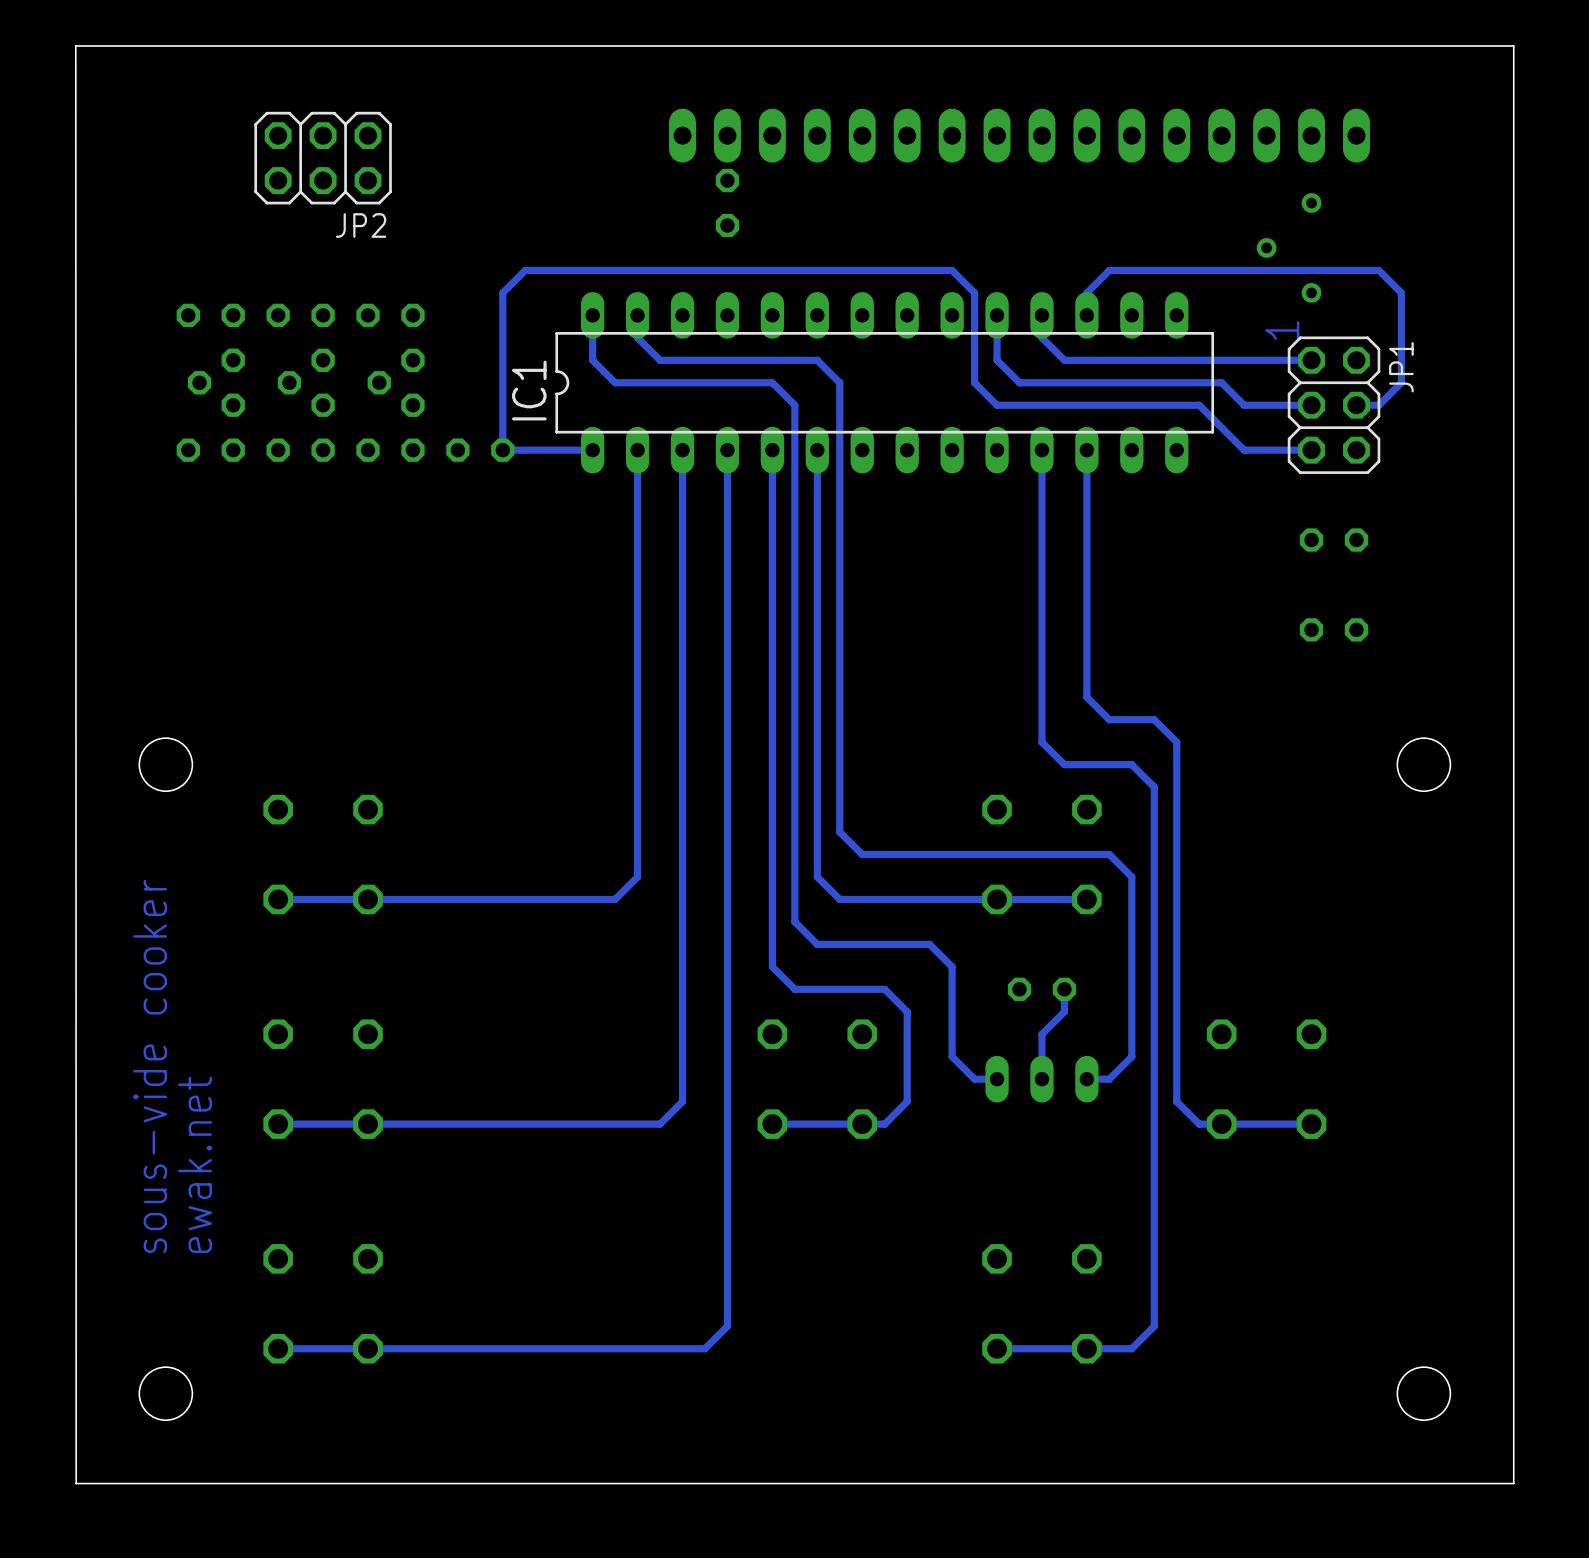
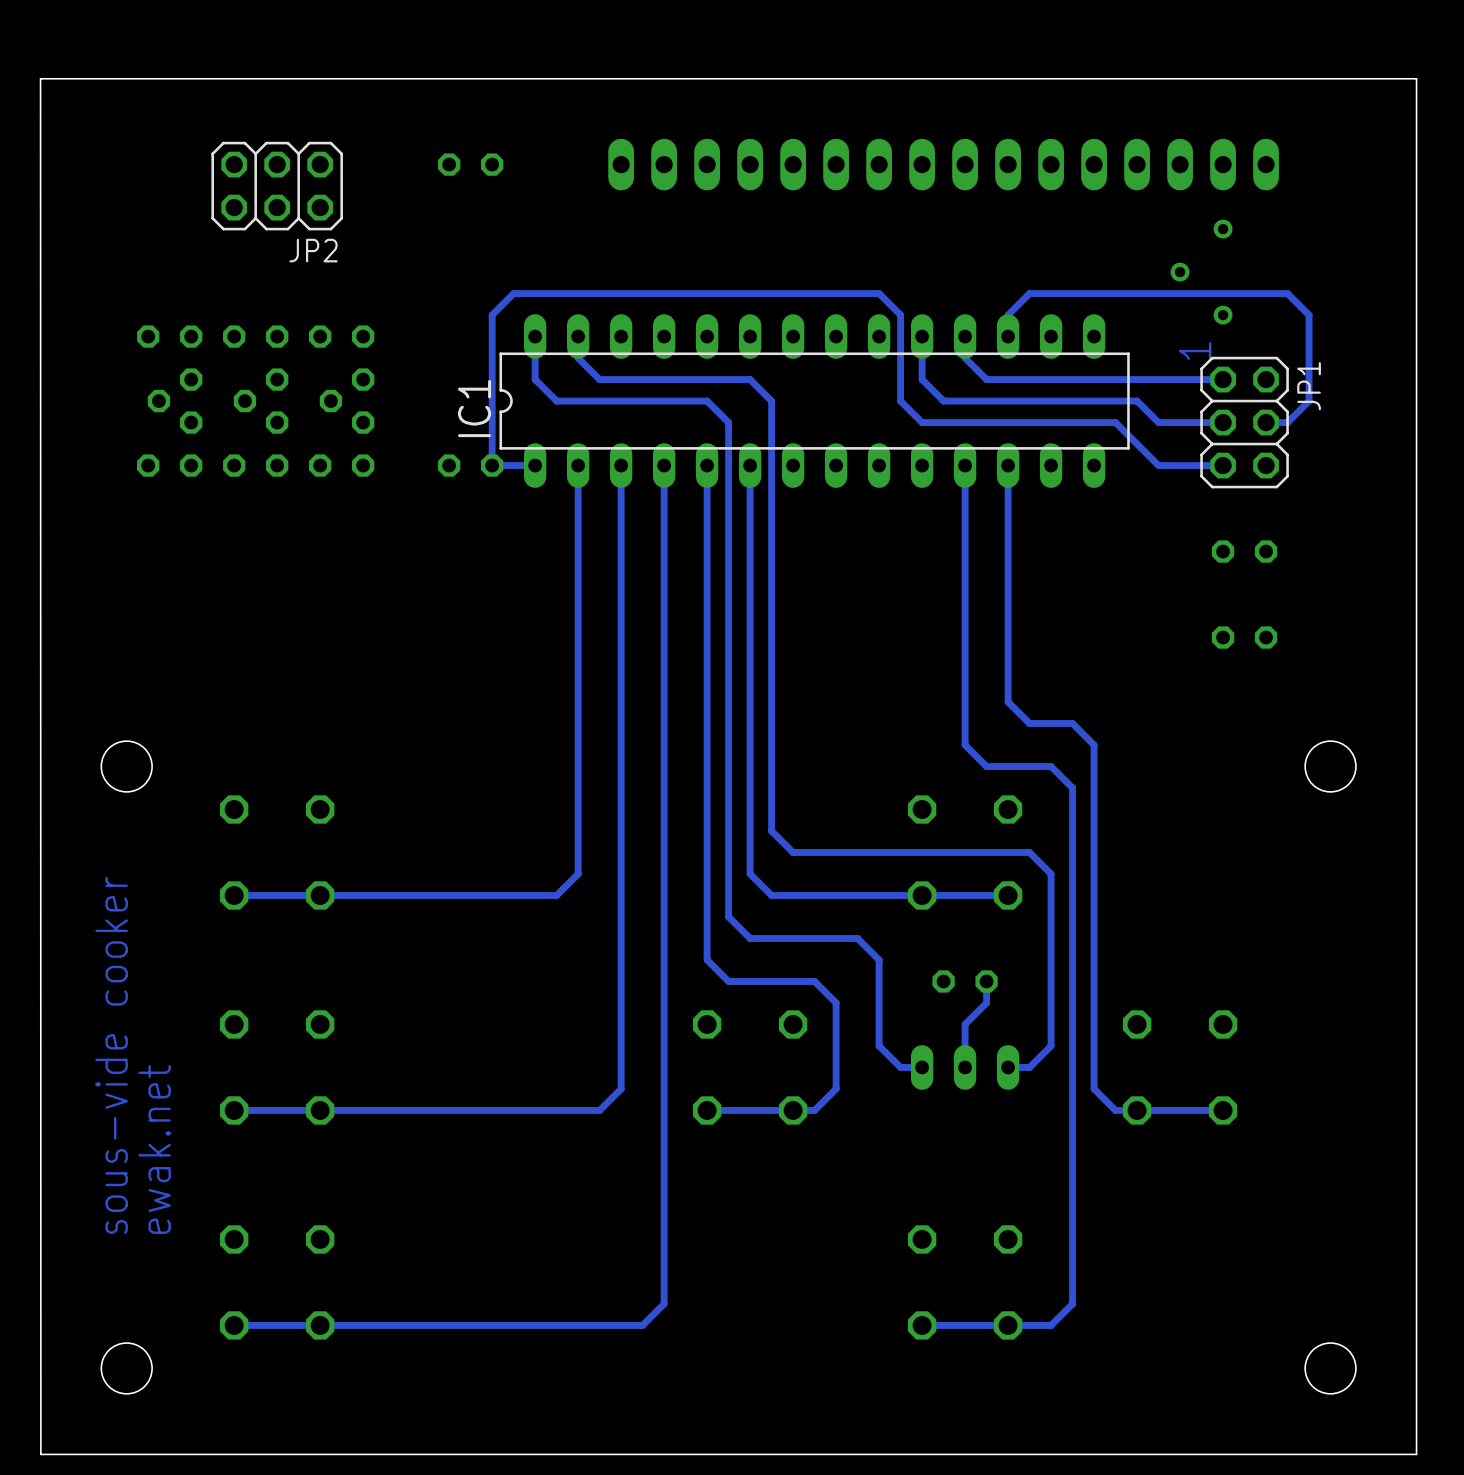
part: none -> (470, 164)
part: (727, 203) -> none
track: (570, 270) (525, 270) (502, 292) (502, 450) (547, 450) -> (513, 293) (492, 315) (492, 465)
part position: (480, 450) -> (470, 465)

